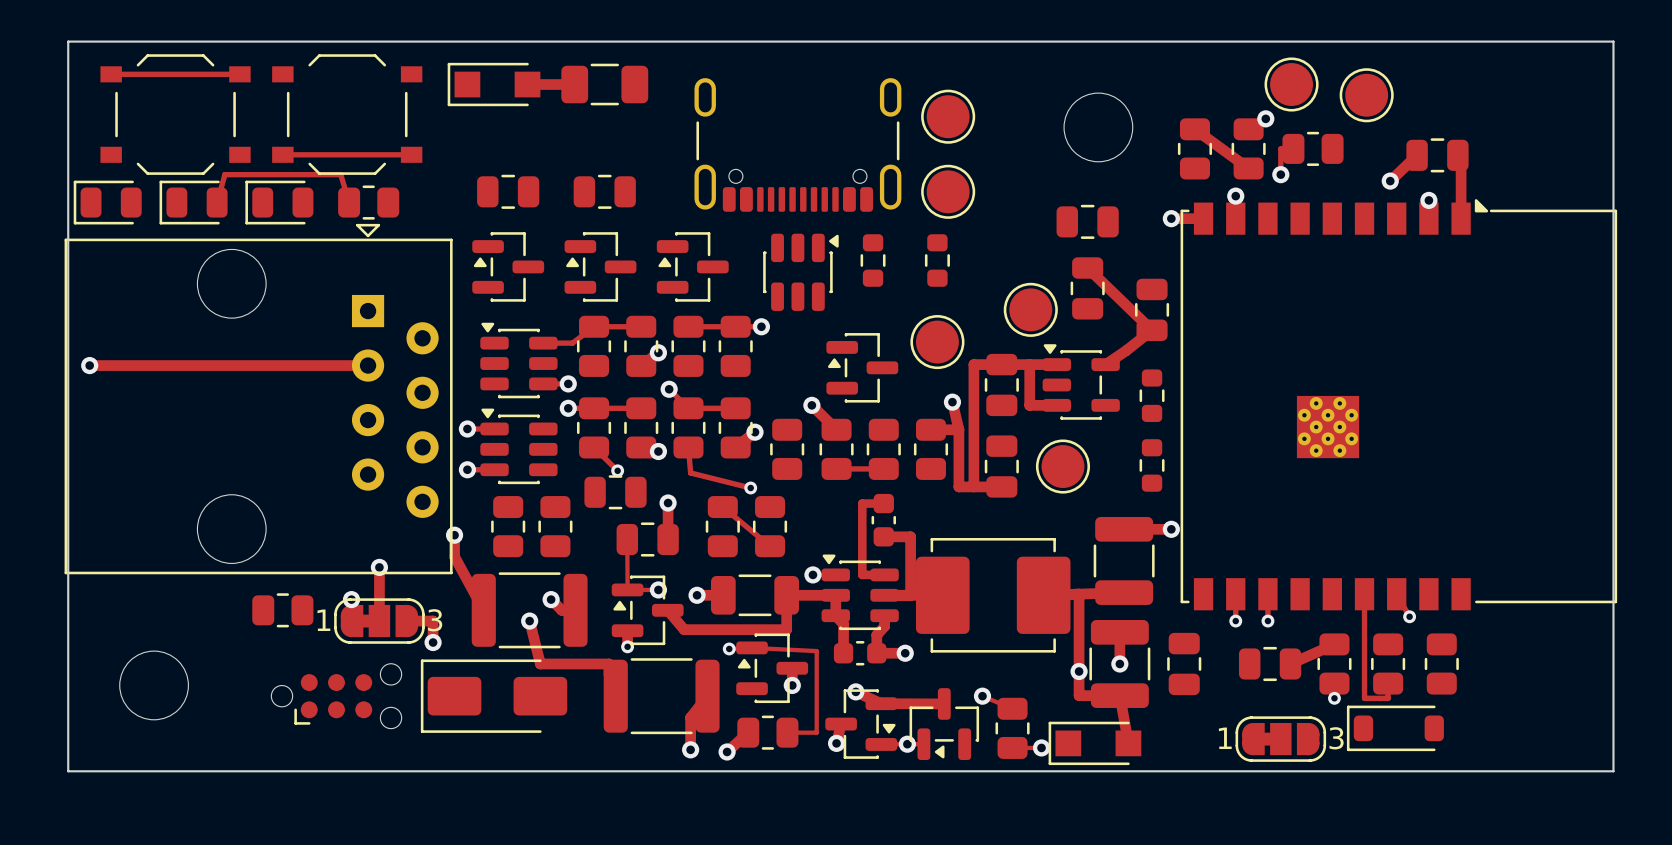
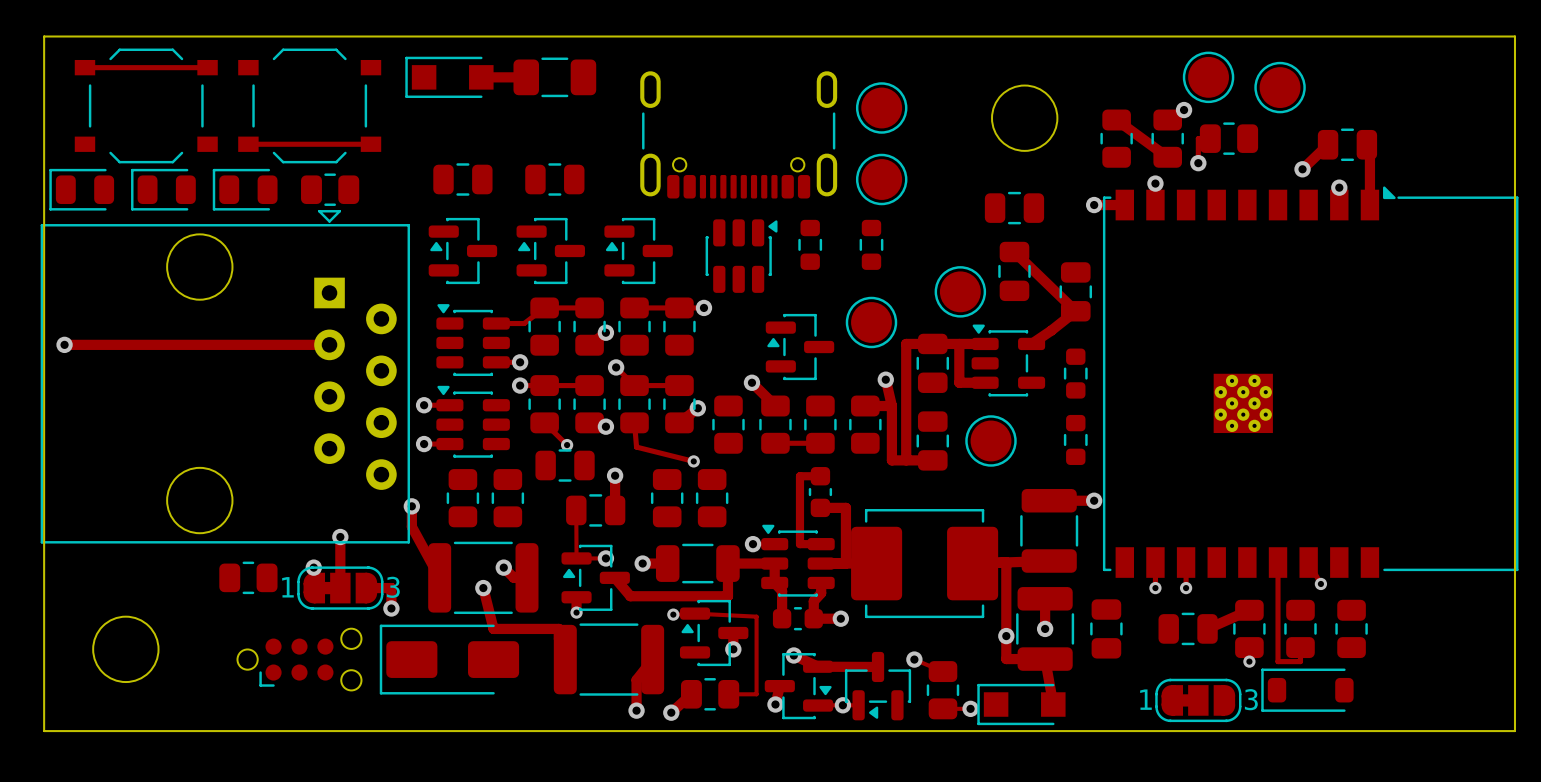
track: (217, 202) (224, 174) (340, 174) (349, 202) -> none
track: (722, 507) (770, 546) -> none

